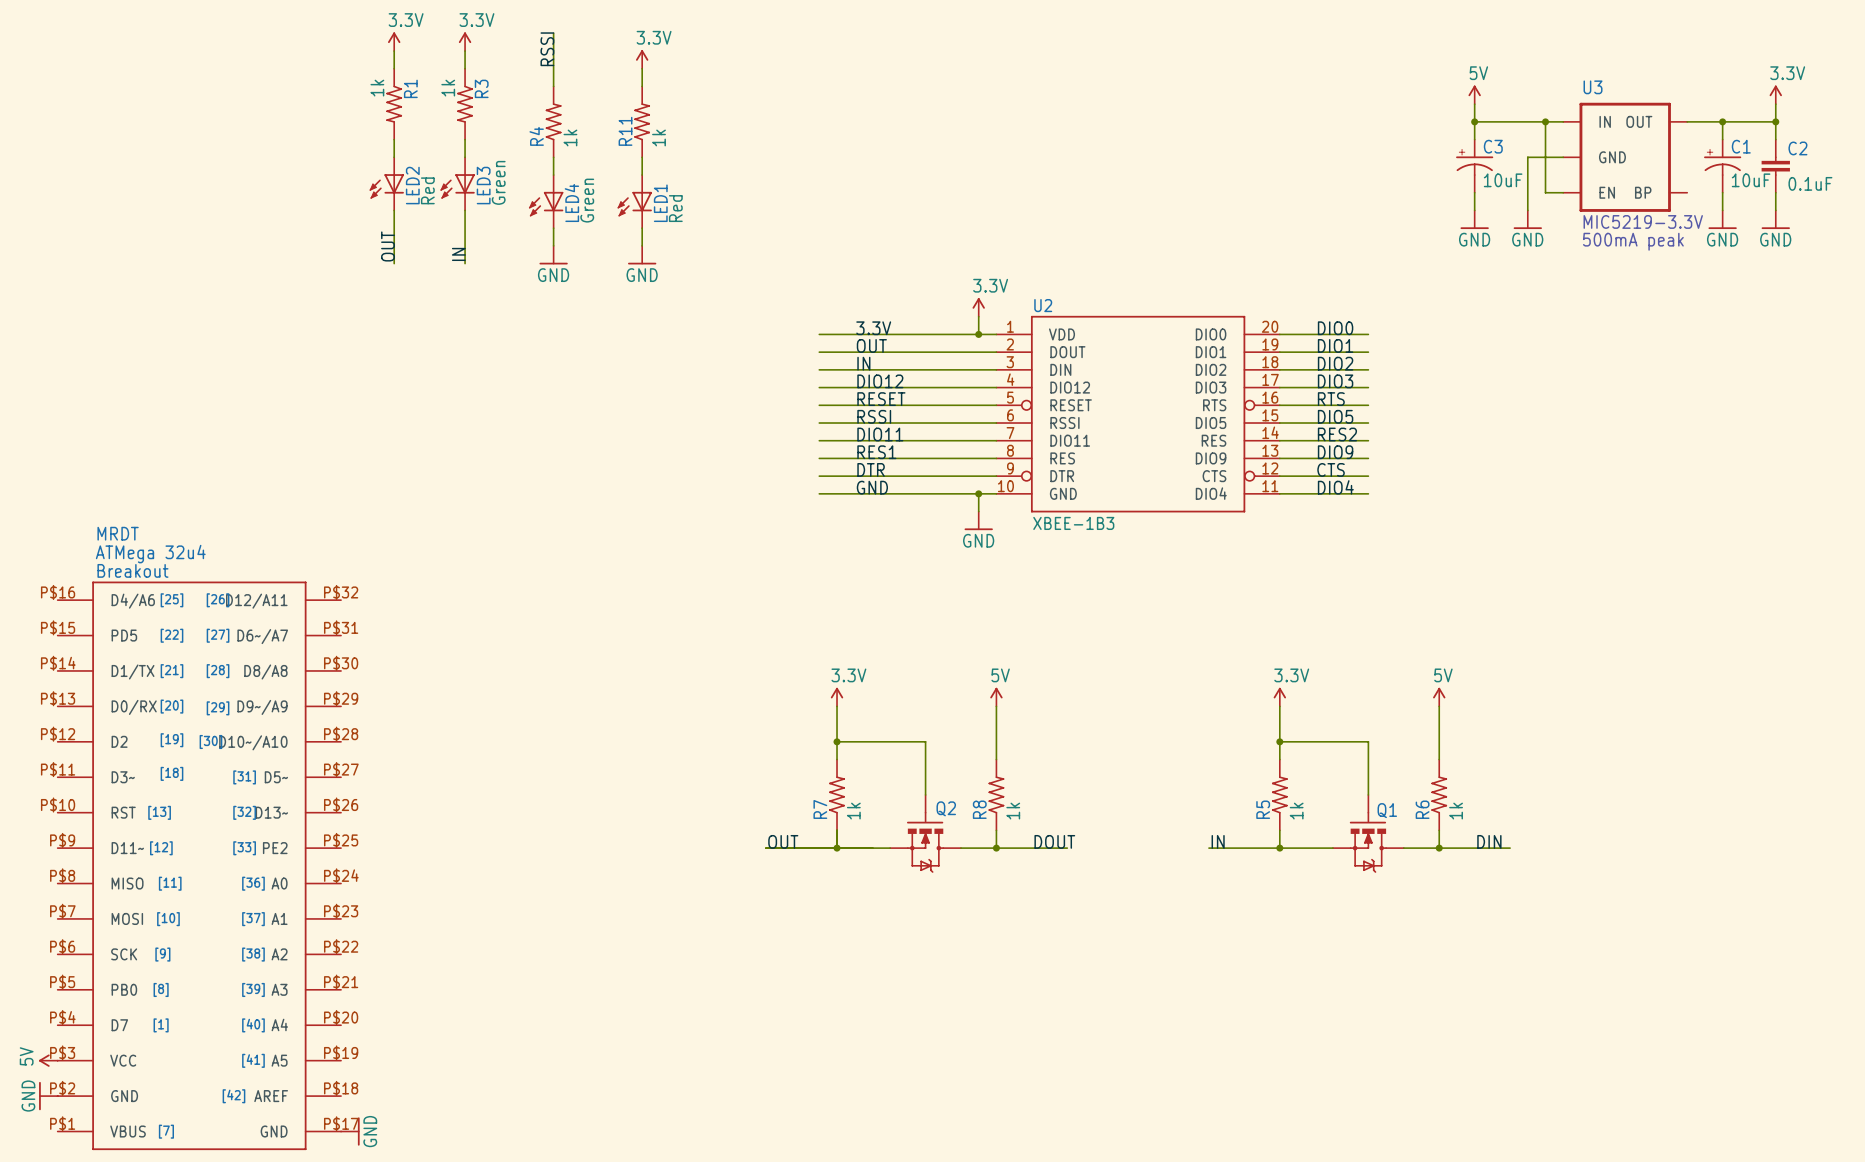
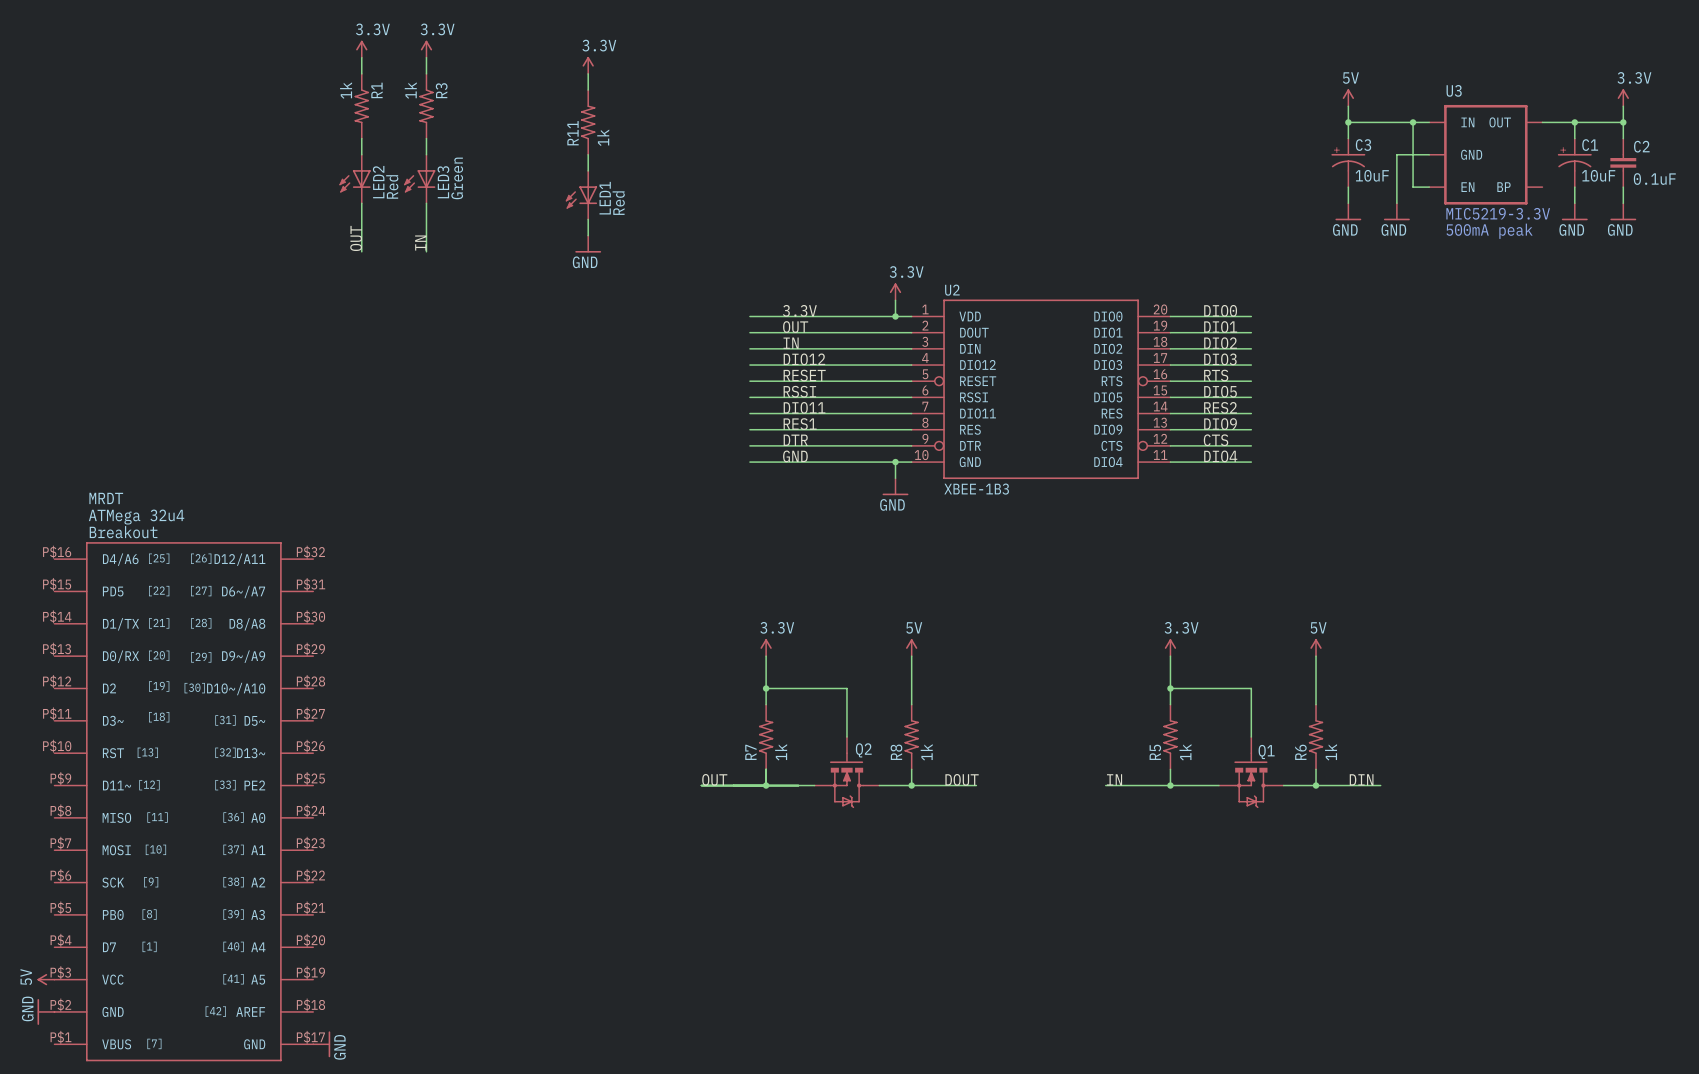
wire: (553, 33) (553, 86) -> none
label: RSSI (547, 49) -> none
R4: 1k (553, 121) -> none
wire: (553, 157) (553, 175) -> none
LED4: Green (546, 201) -> none
wire: (553, 228) (553, 245) -> none
power symbol: GND (553, 255) -> none

